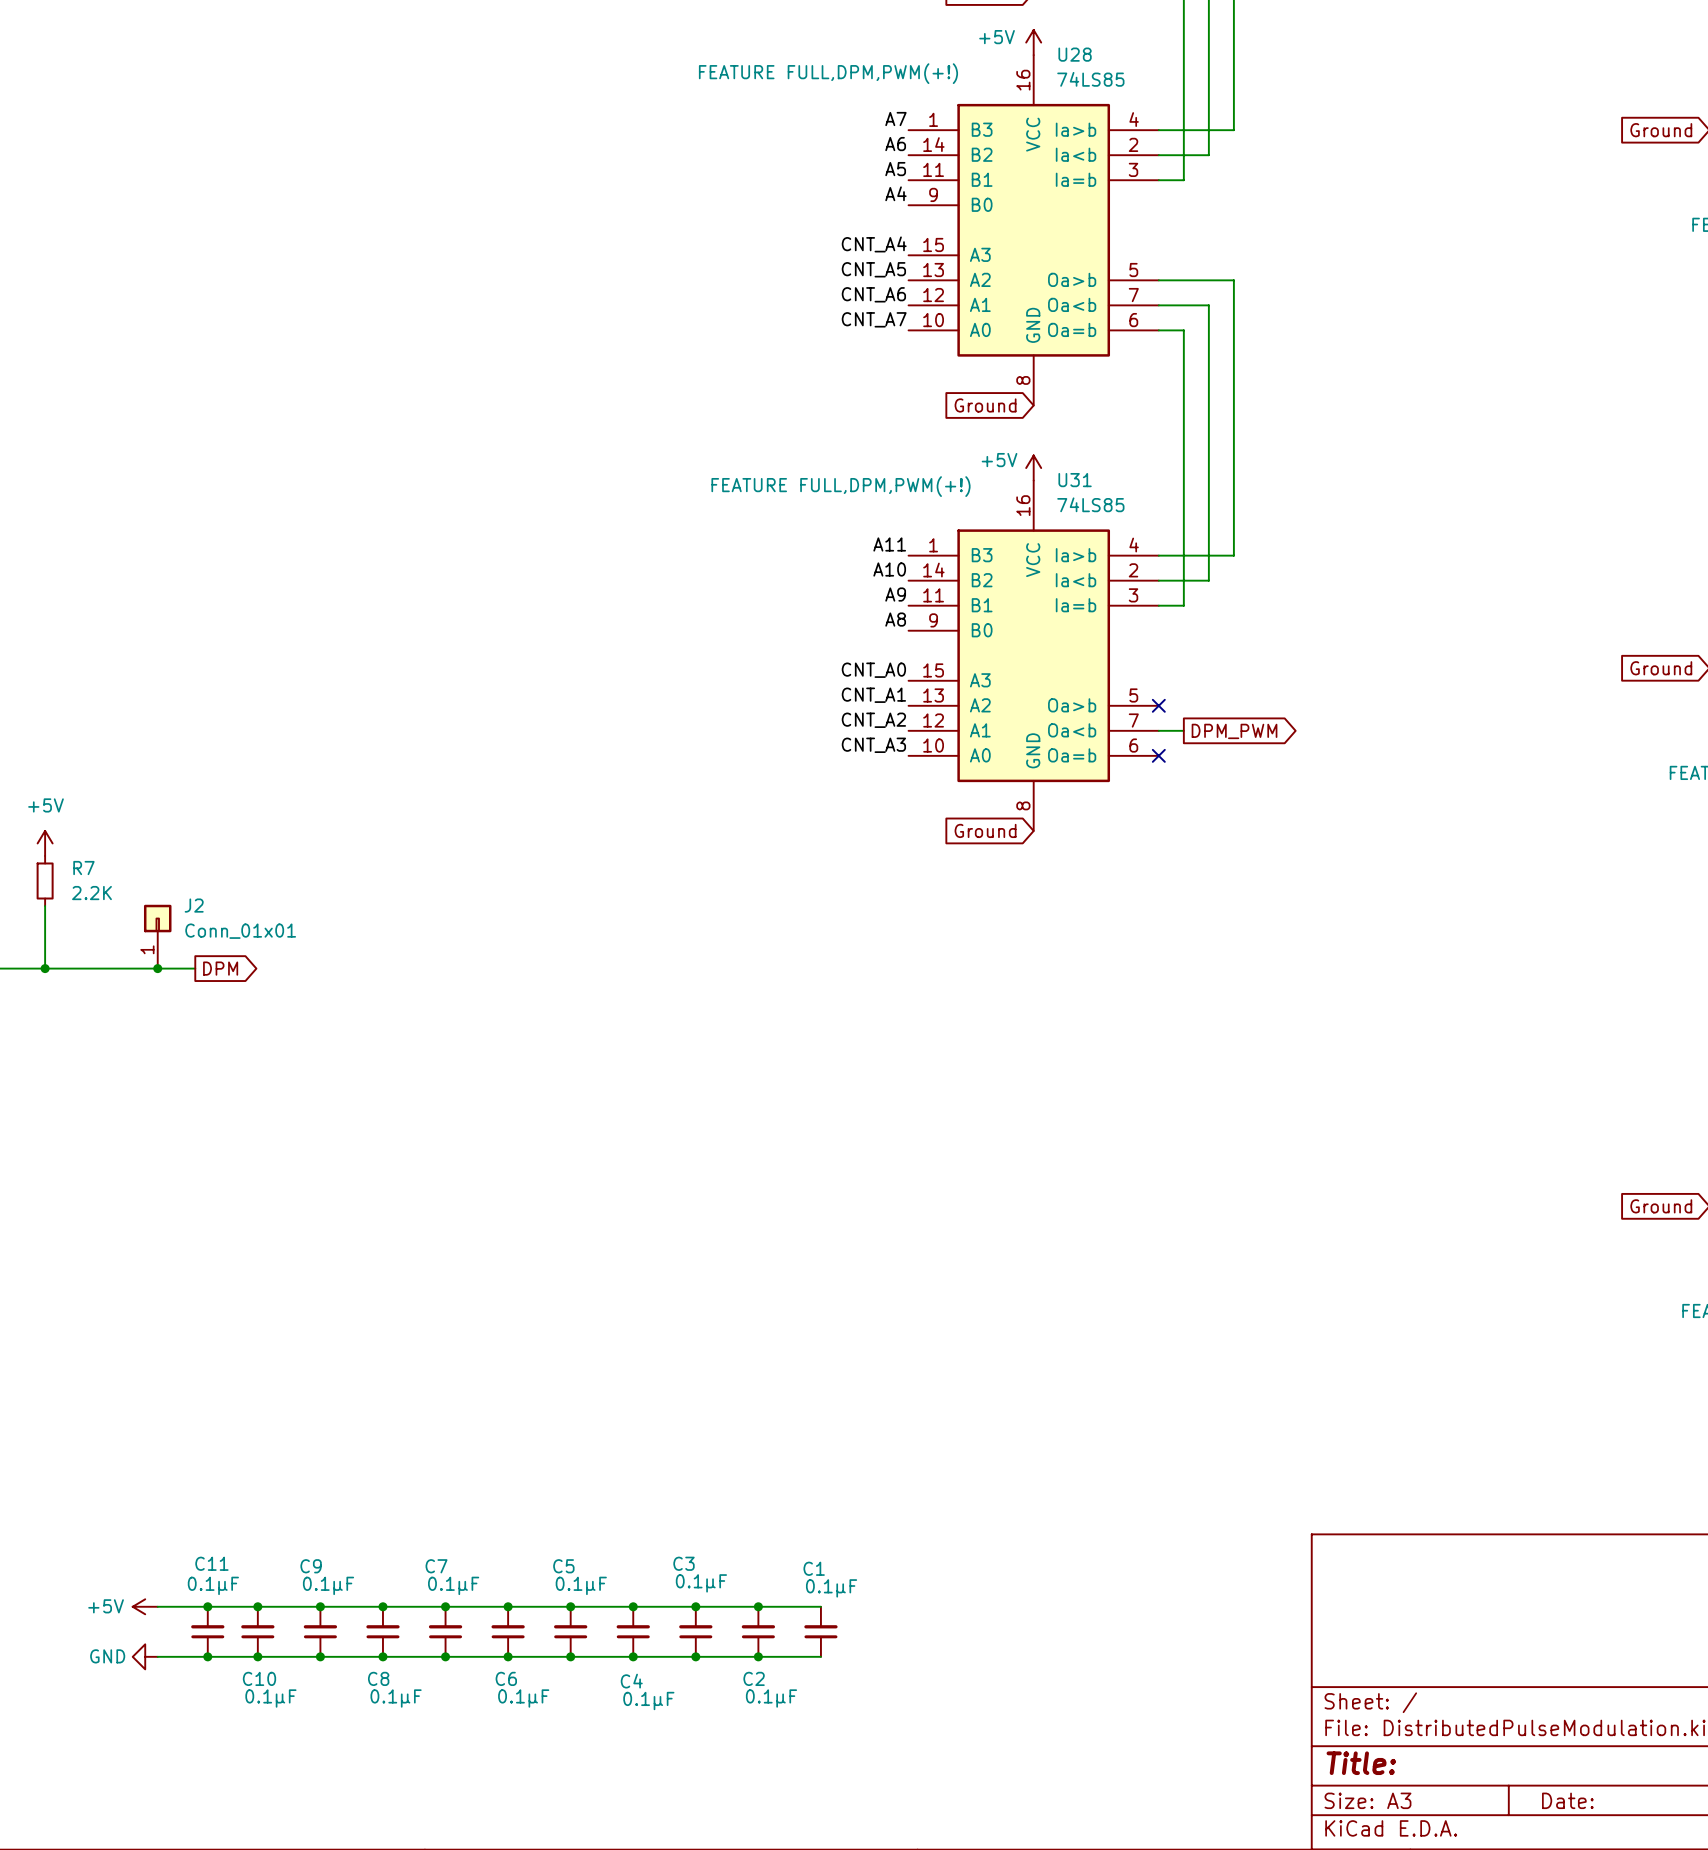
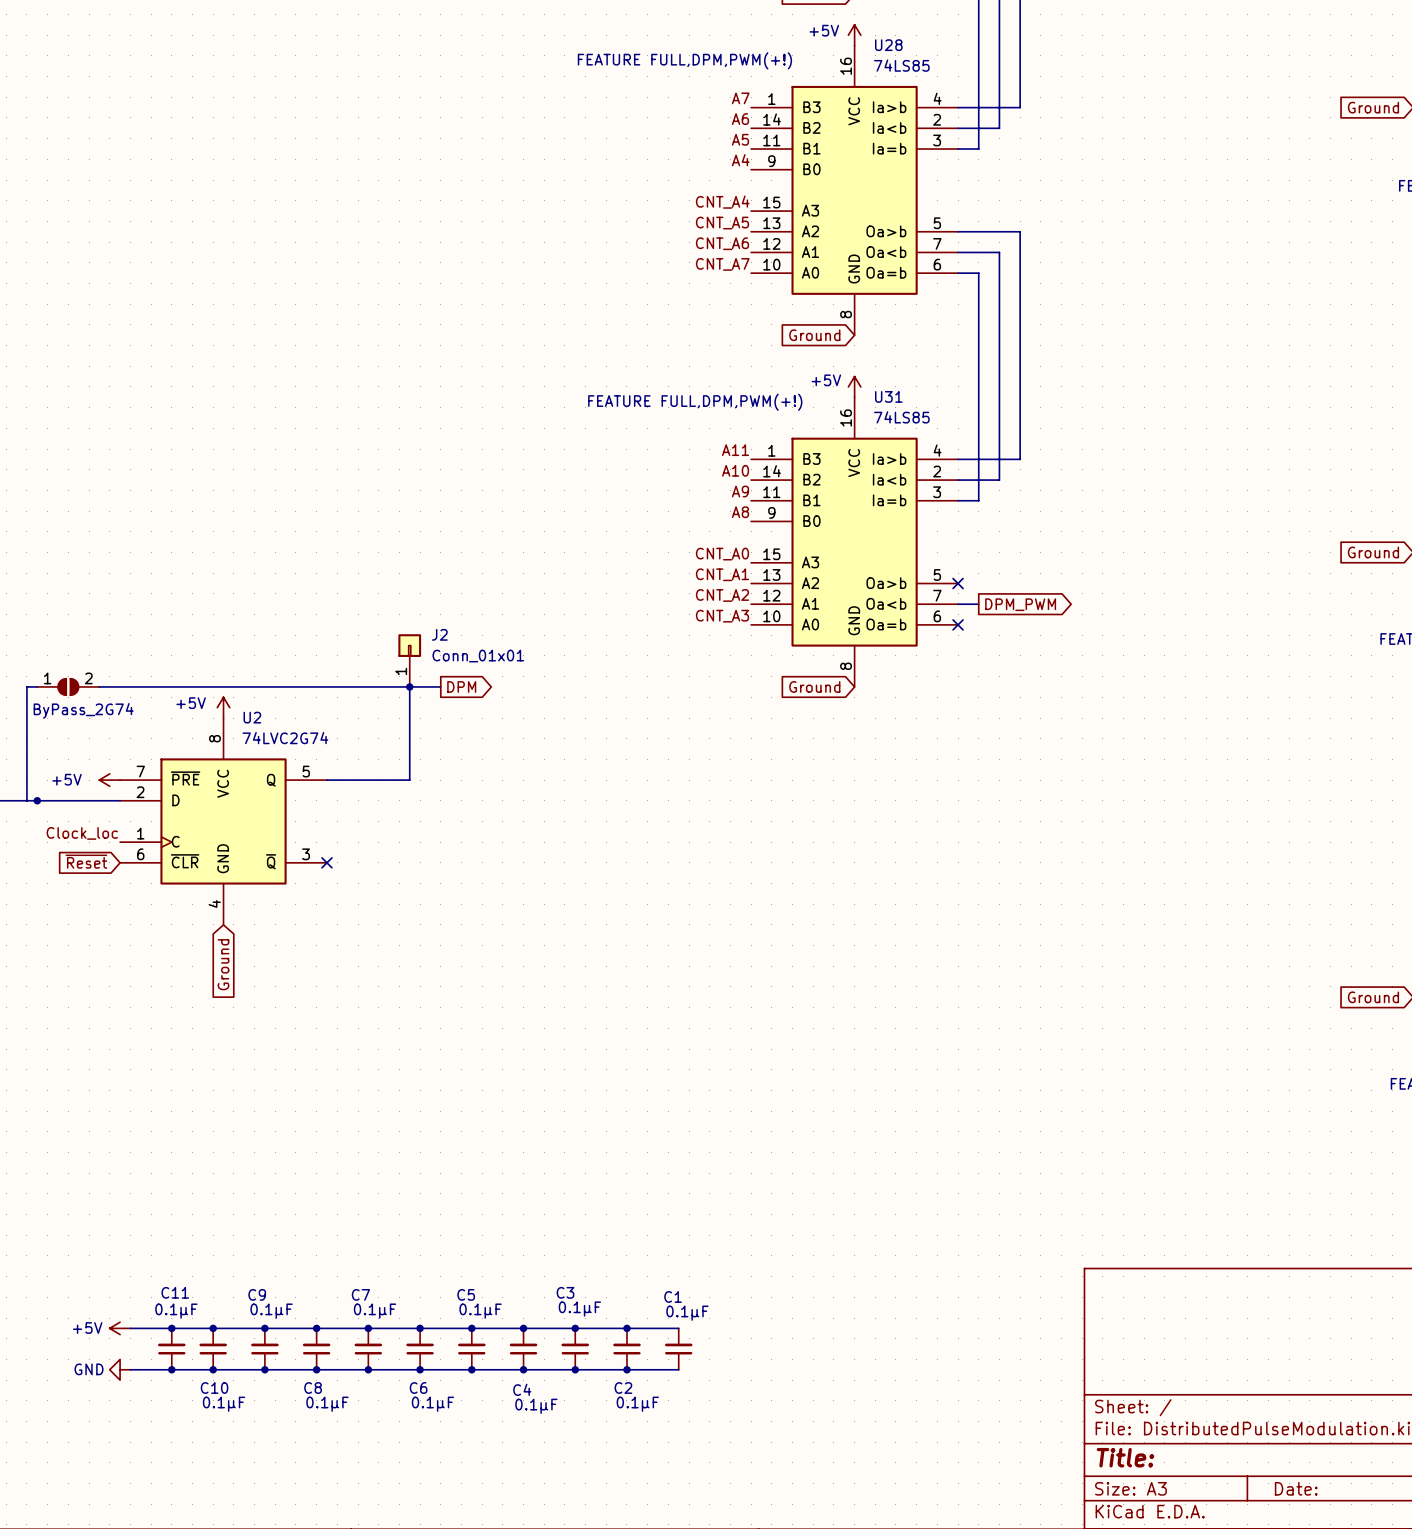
wire: none -> (37, 686) (26, 686) (26, 800)
ByPass_2G74: none -> (68, 686)
wire: none -> (99, 686) (440, 686)
wire: none -> (409, 686) (409, 780) (326, 780)
junction: none -> (409, 686)
global label: none -> DPM (461, 686)
power symbol: +5V (45, 843) -> none
power symbol: none -> +5V (223, 707)
R7: 2.2K (45, 880) -> none
wire: (45, 906) (45, 968) -> none
J2 position: (157, 936) -> (409, 660)
power symbol: none -> +5V (109, 780)
junction: (157, 968) -> none
global label: DPM (220, 968) -> none
U2: none -> 74LVC2G74 (223, 821)
label: none -> Clock_loc (82, 833)
global label: none -> ~{Reset} (86, 861)
no-connect mark: none -> (326, 862)
global label: none -> Ground (223, 964)

